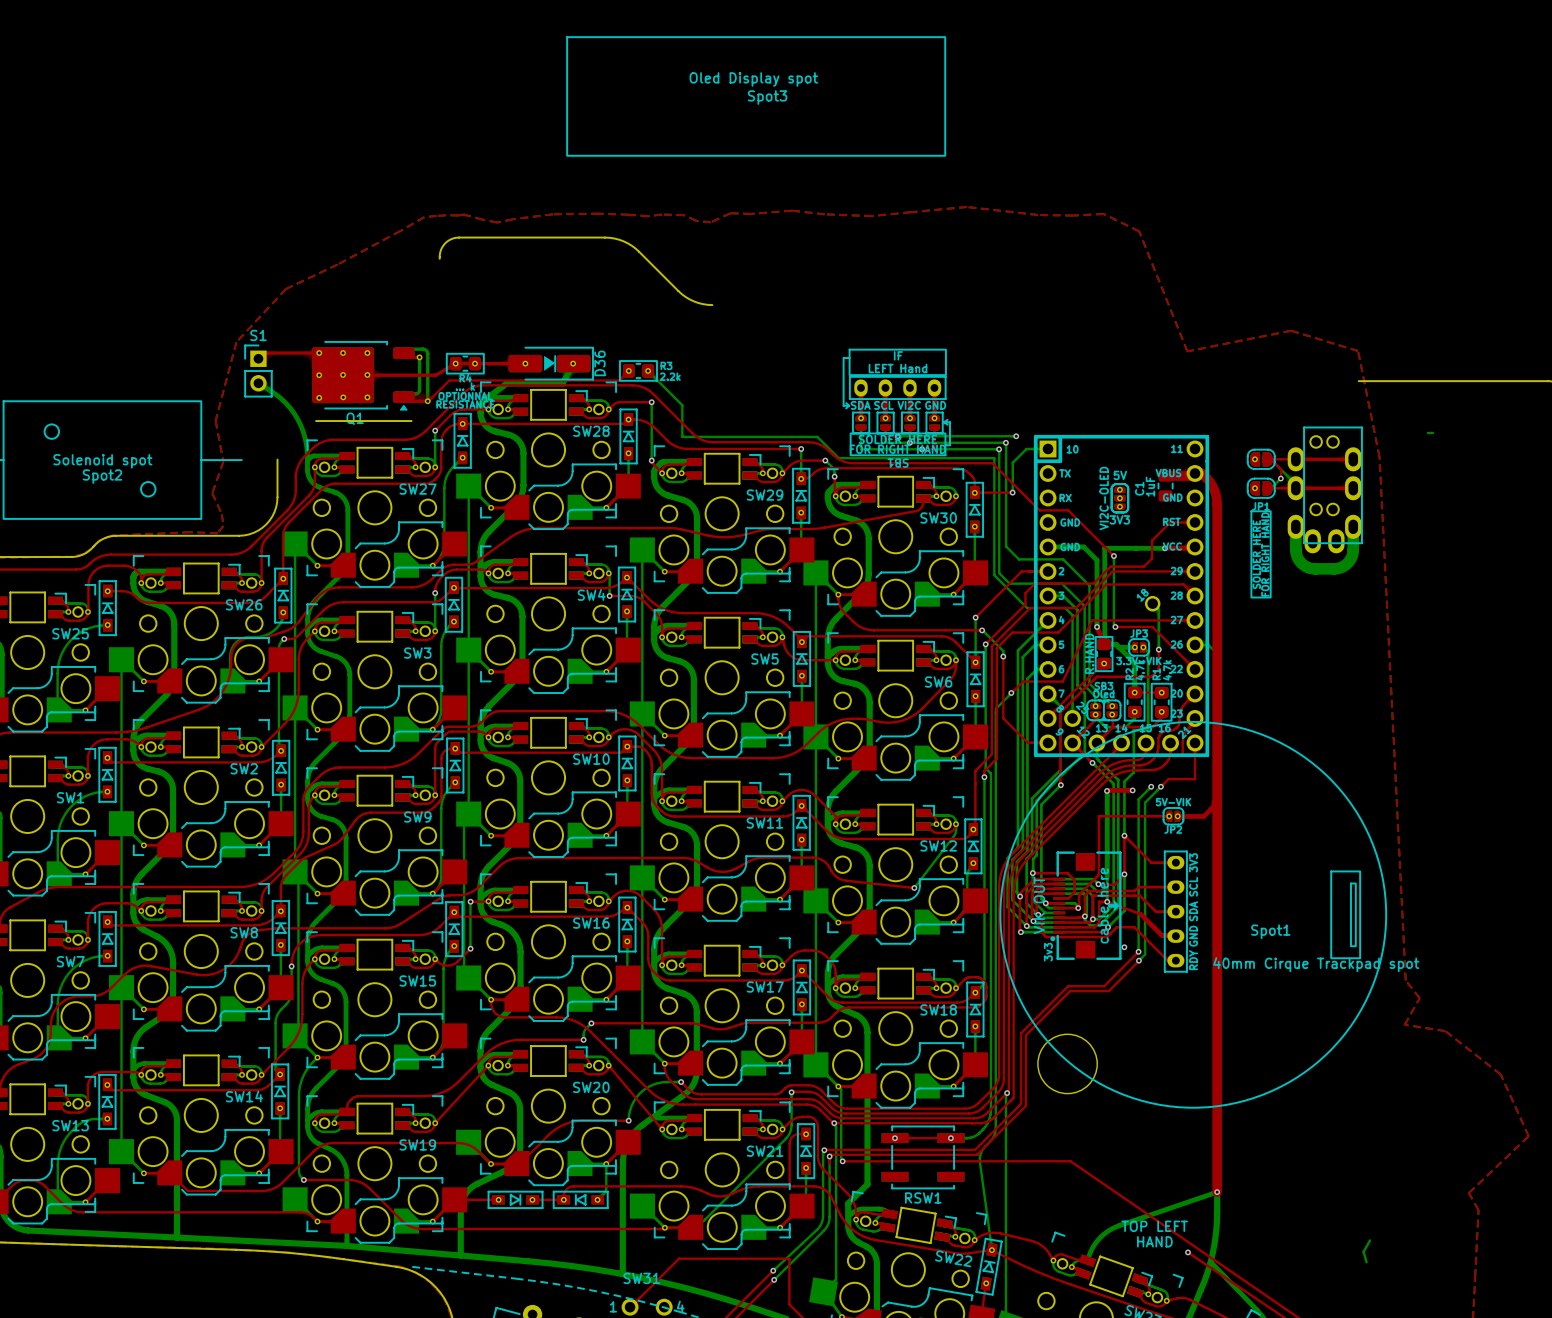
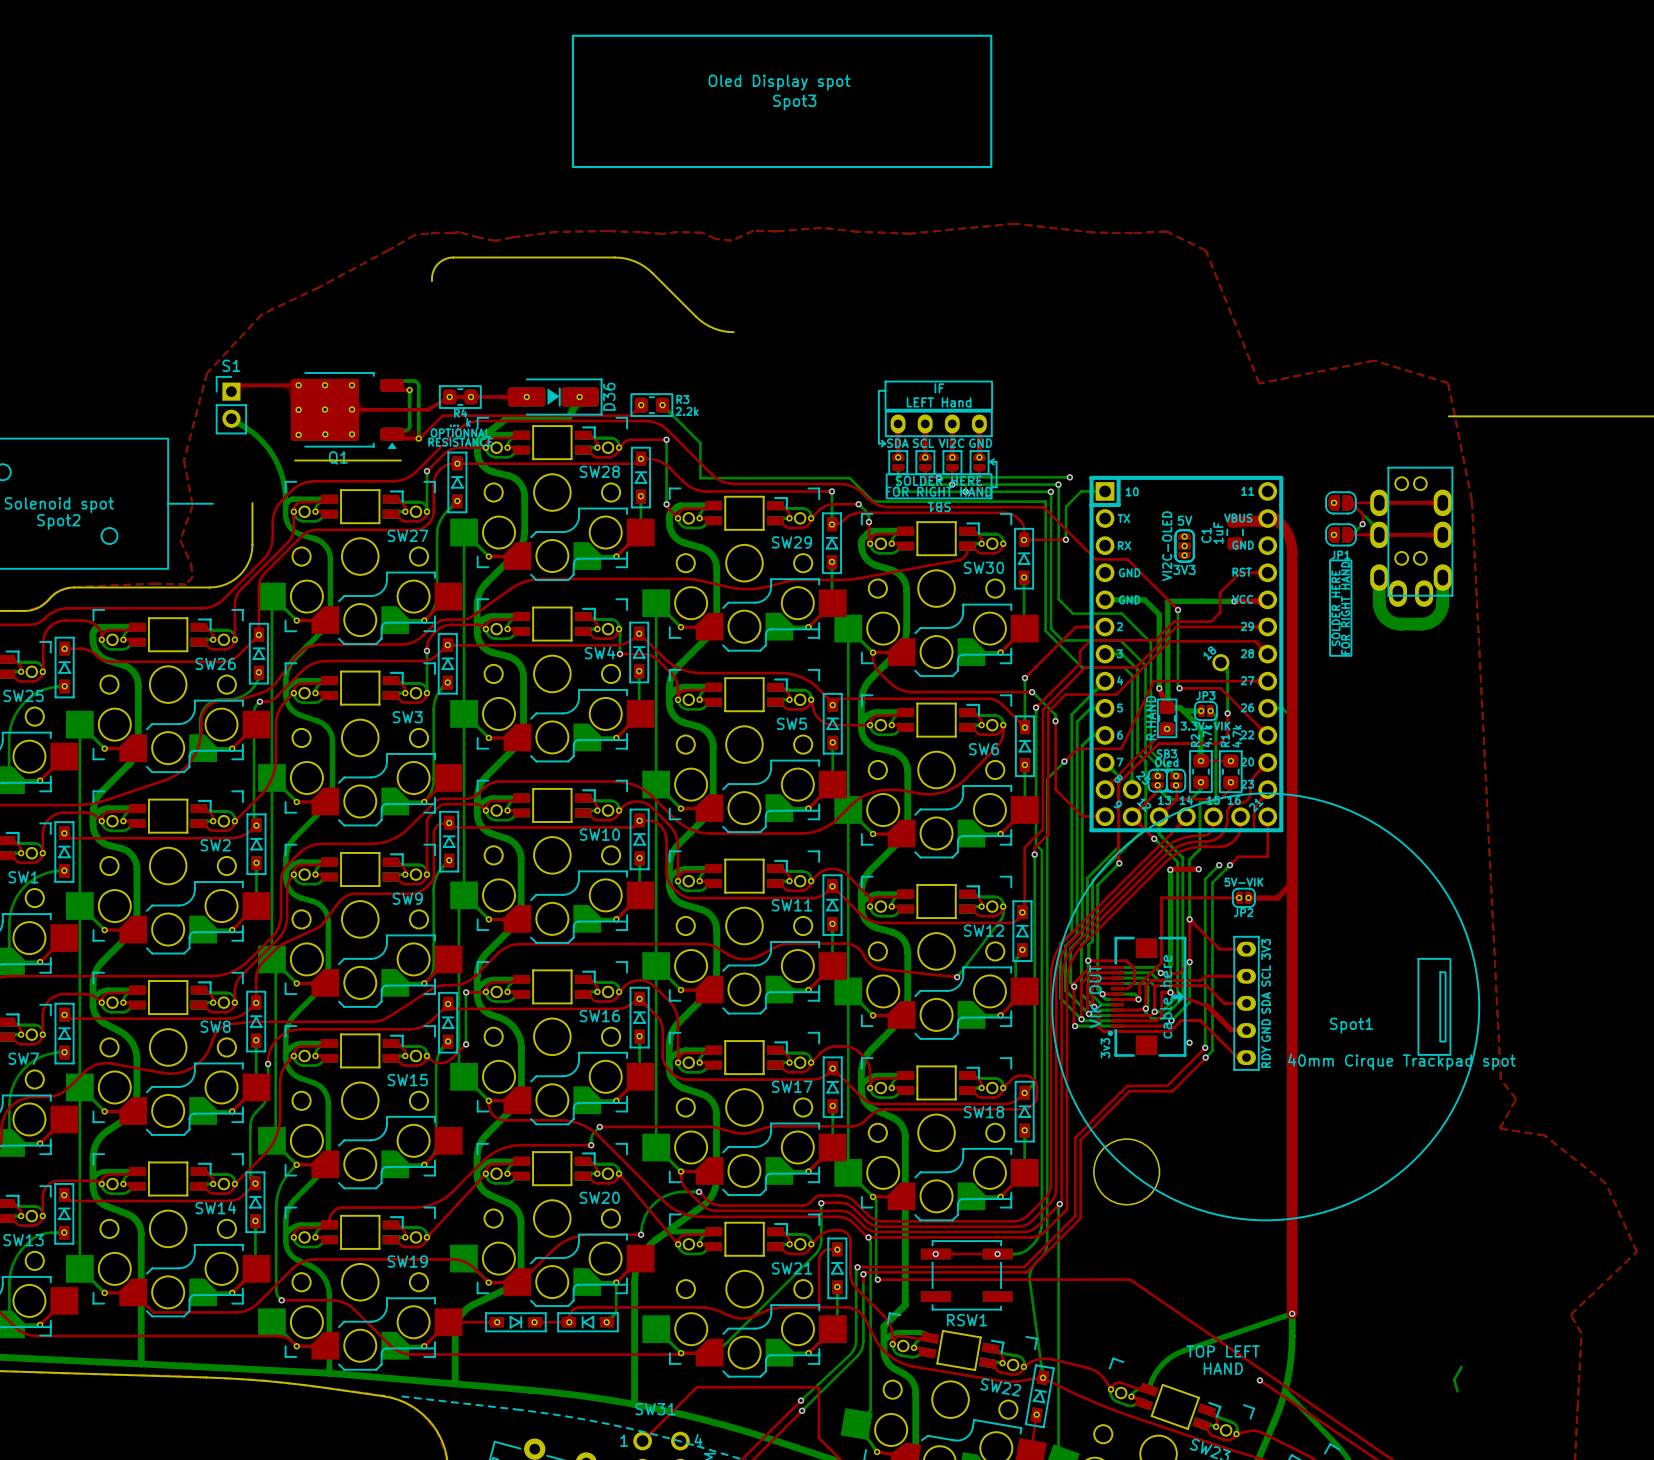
bottom track: (1428, 432) (1432, 432) -> none

